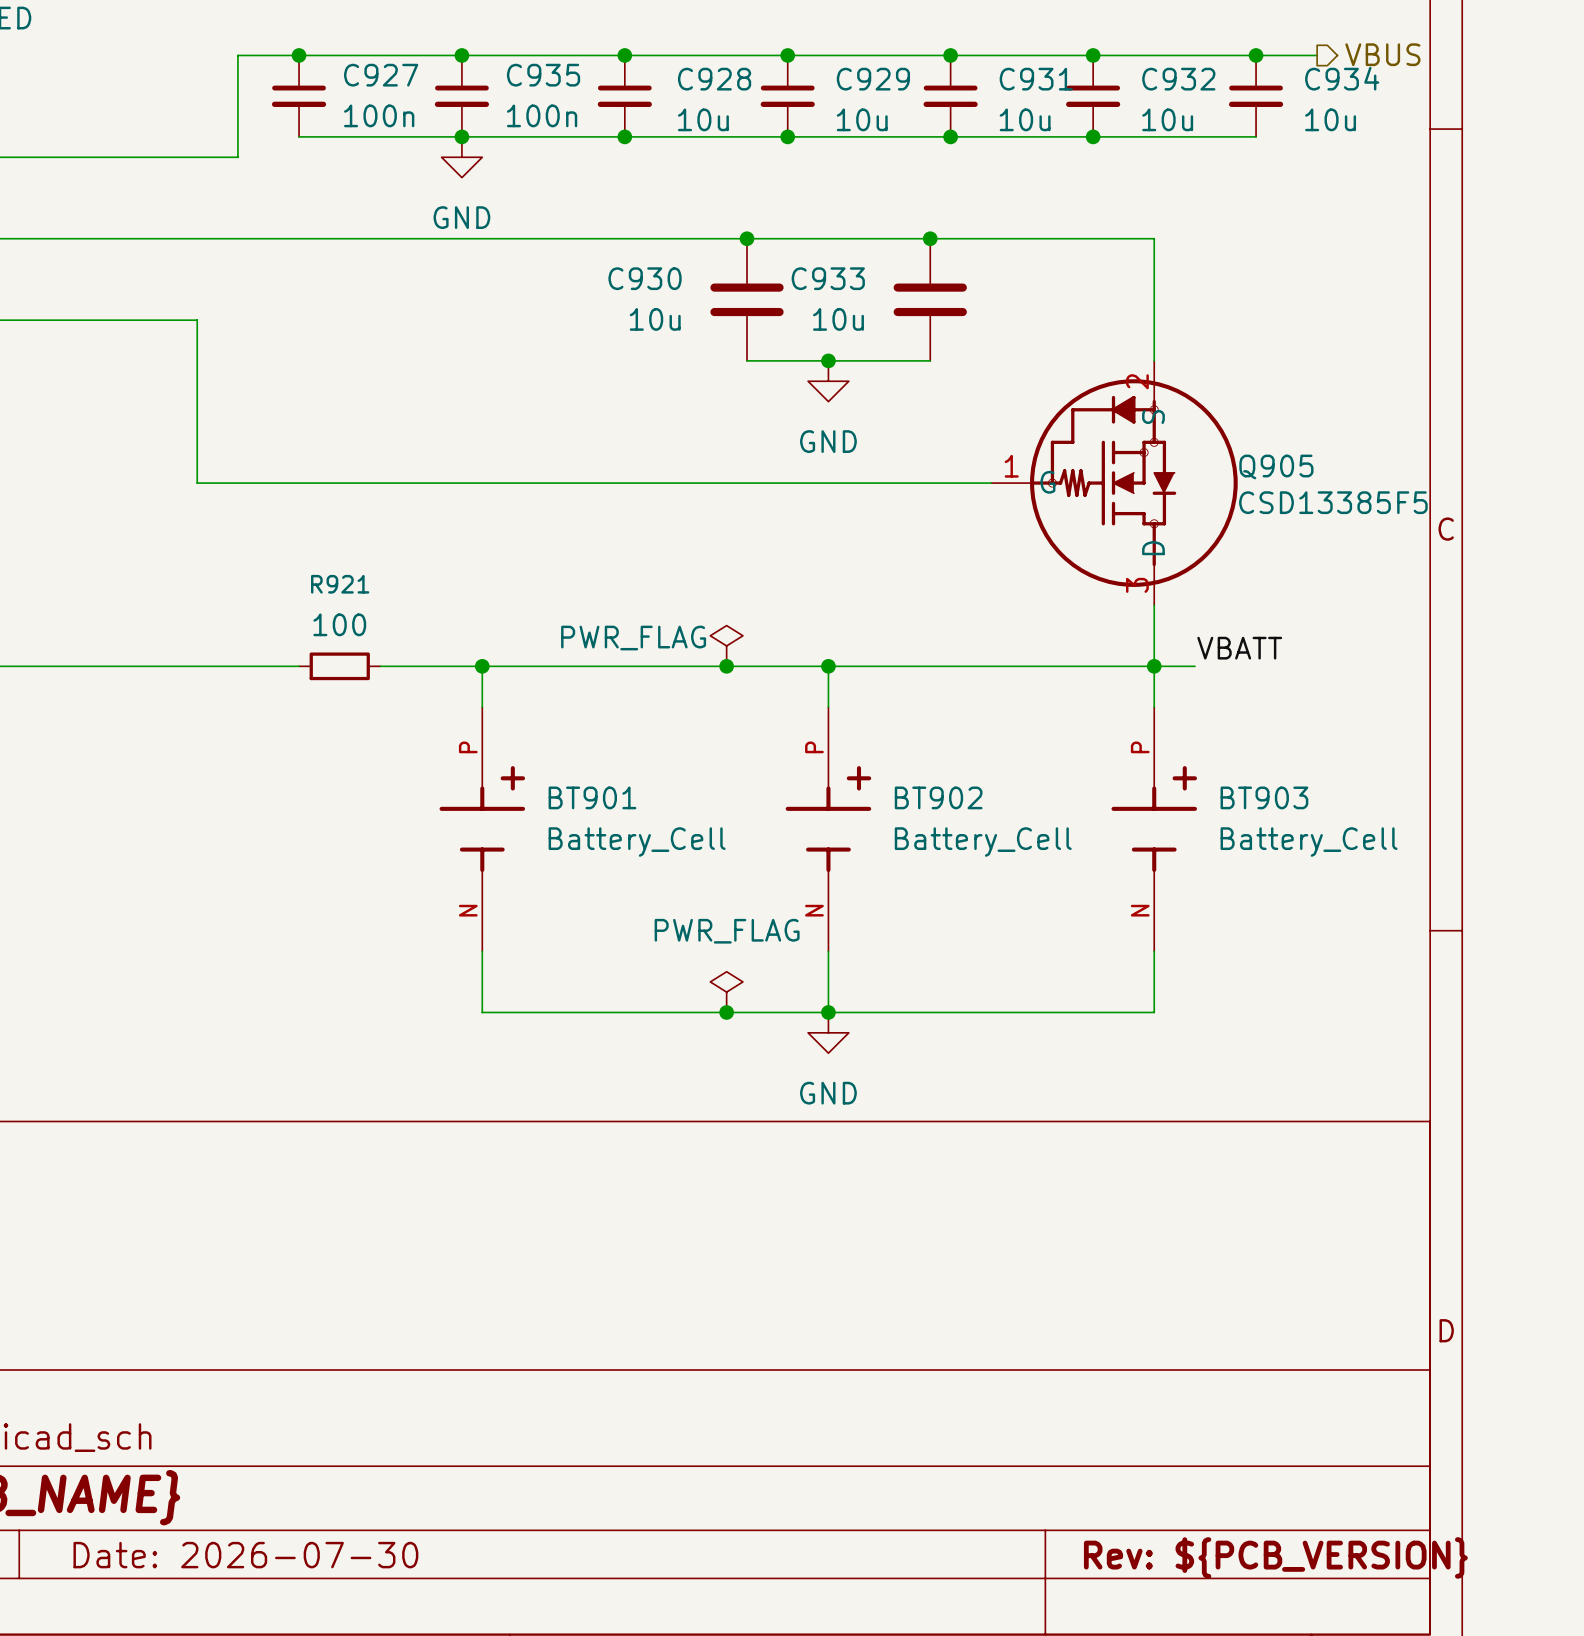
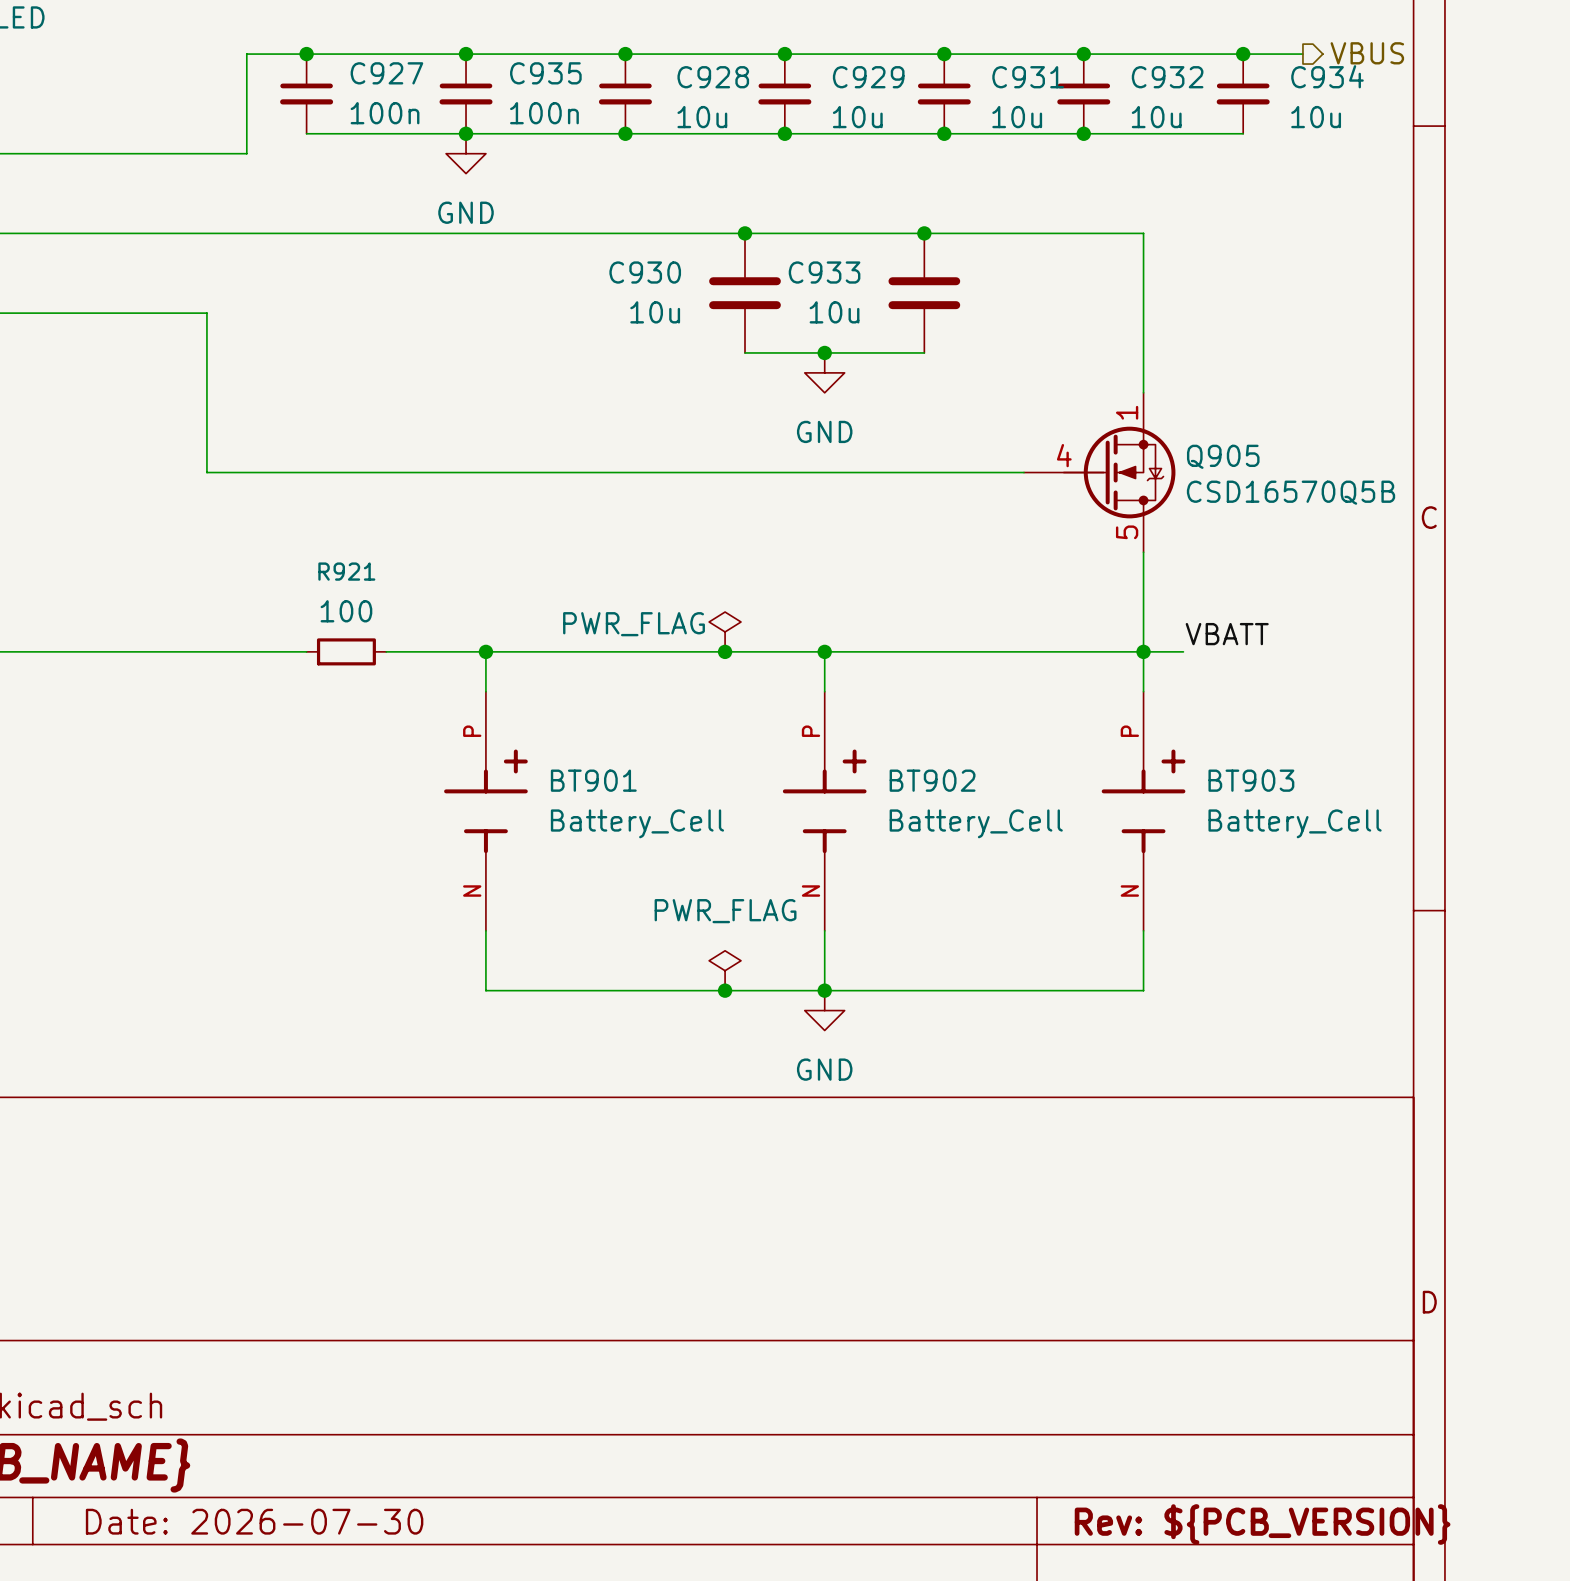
Q905 symbol: [991, 360, 1238, 606] -> [1023, 392, 1176, 553]
Q905 name position: Q905 (1276, 466) -> Q905 (1223, 456)
Q905 value: CSD13385F5 (1333, 502) -> CSD16570Q5B (1291, 492)

